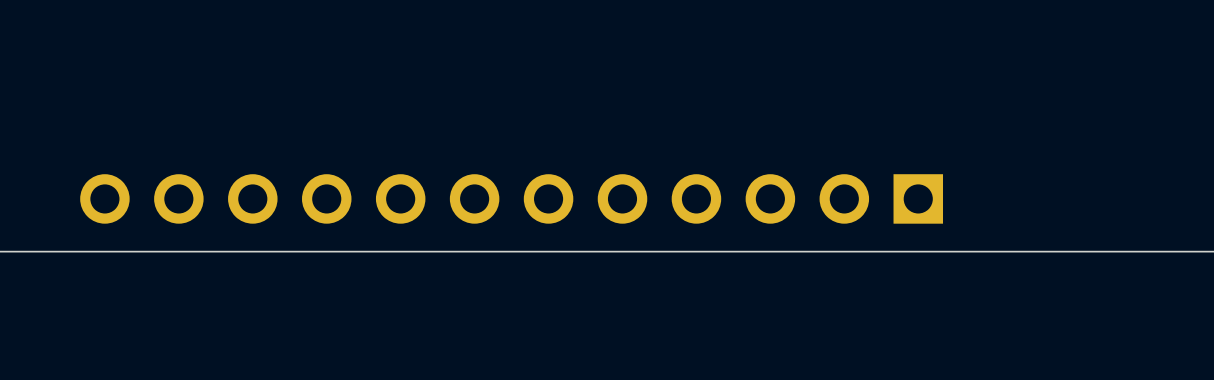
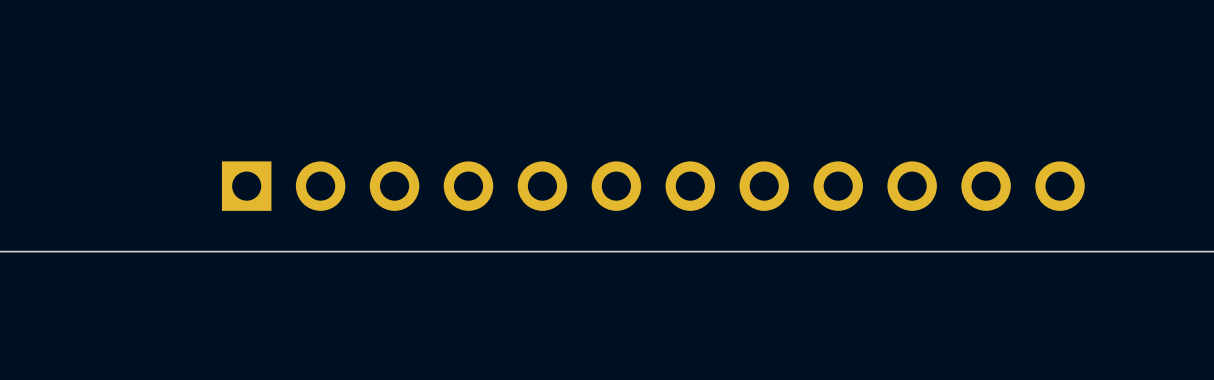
part rotation: 0° (511, 198) -> 180° (653, 186)

